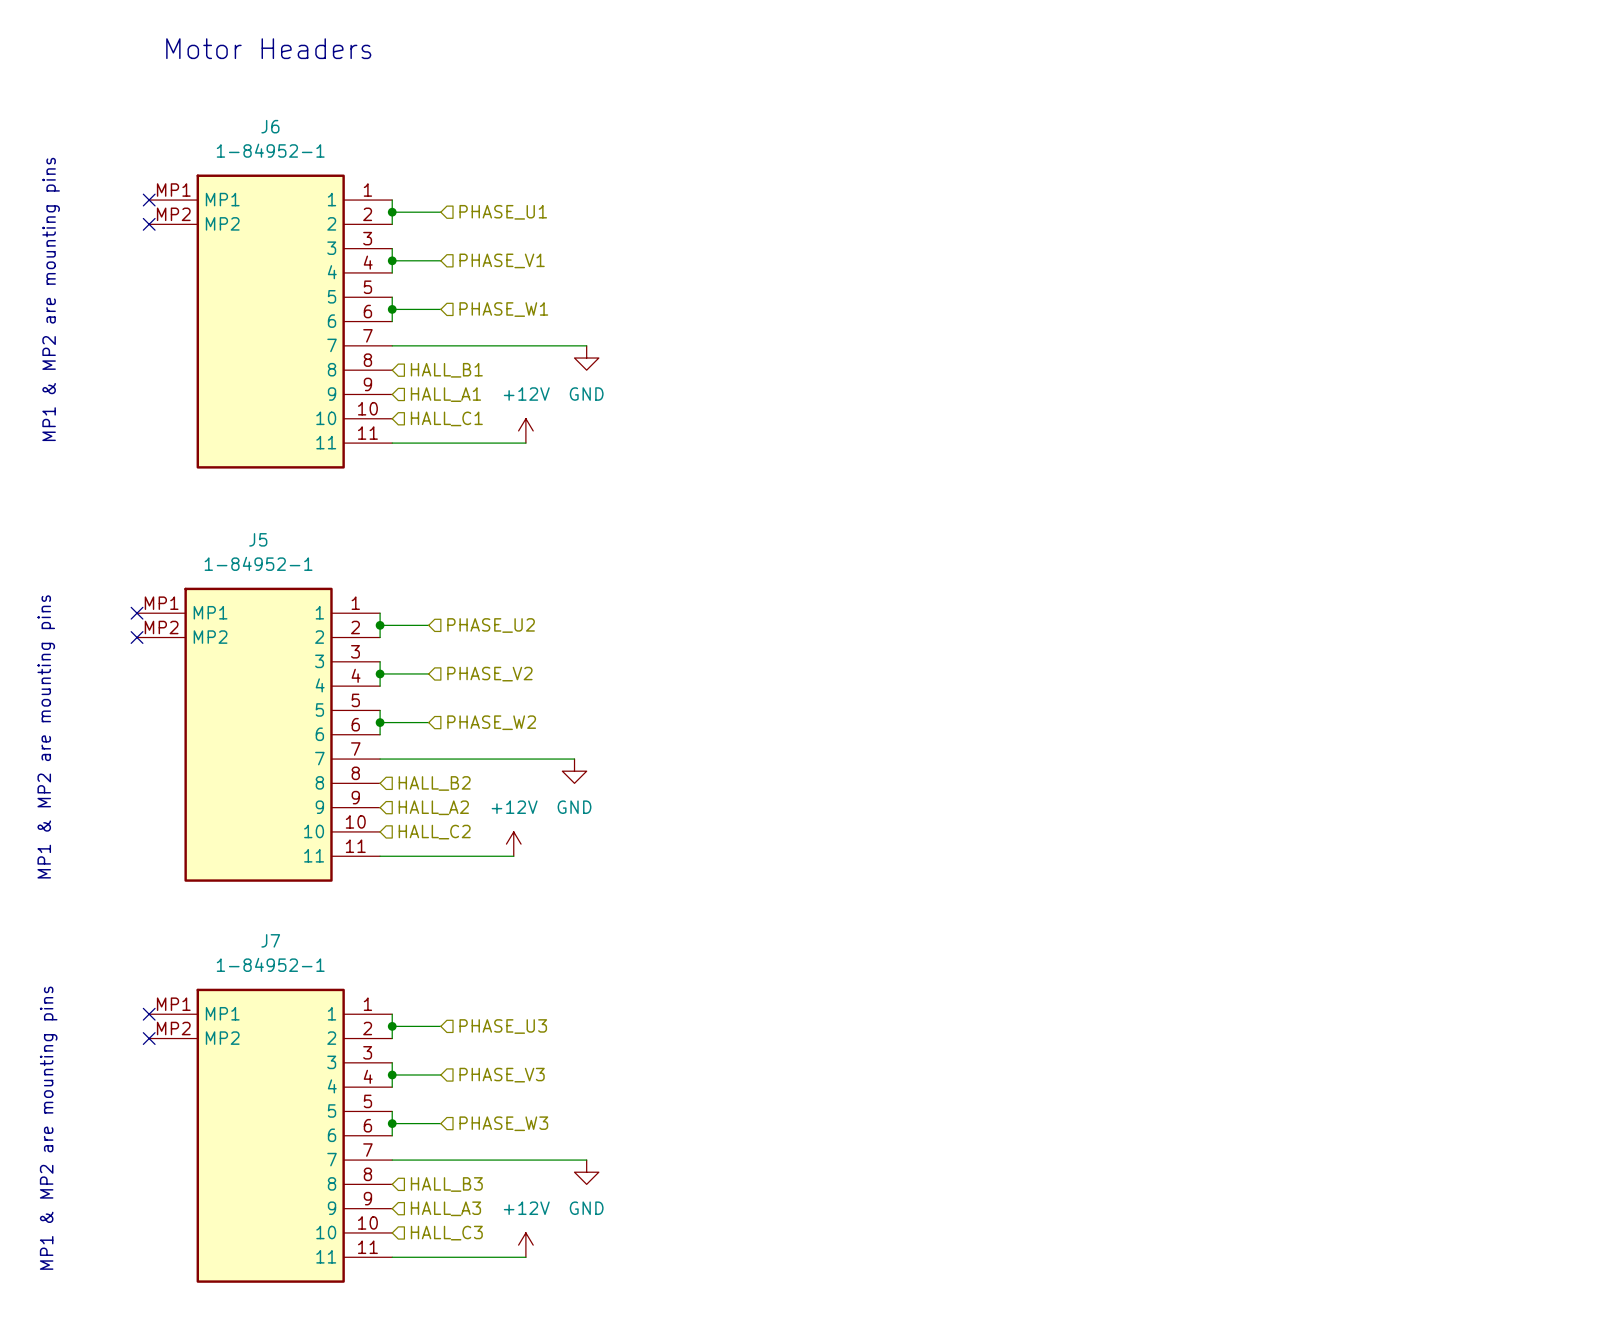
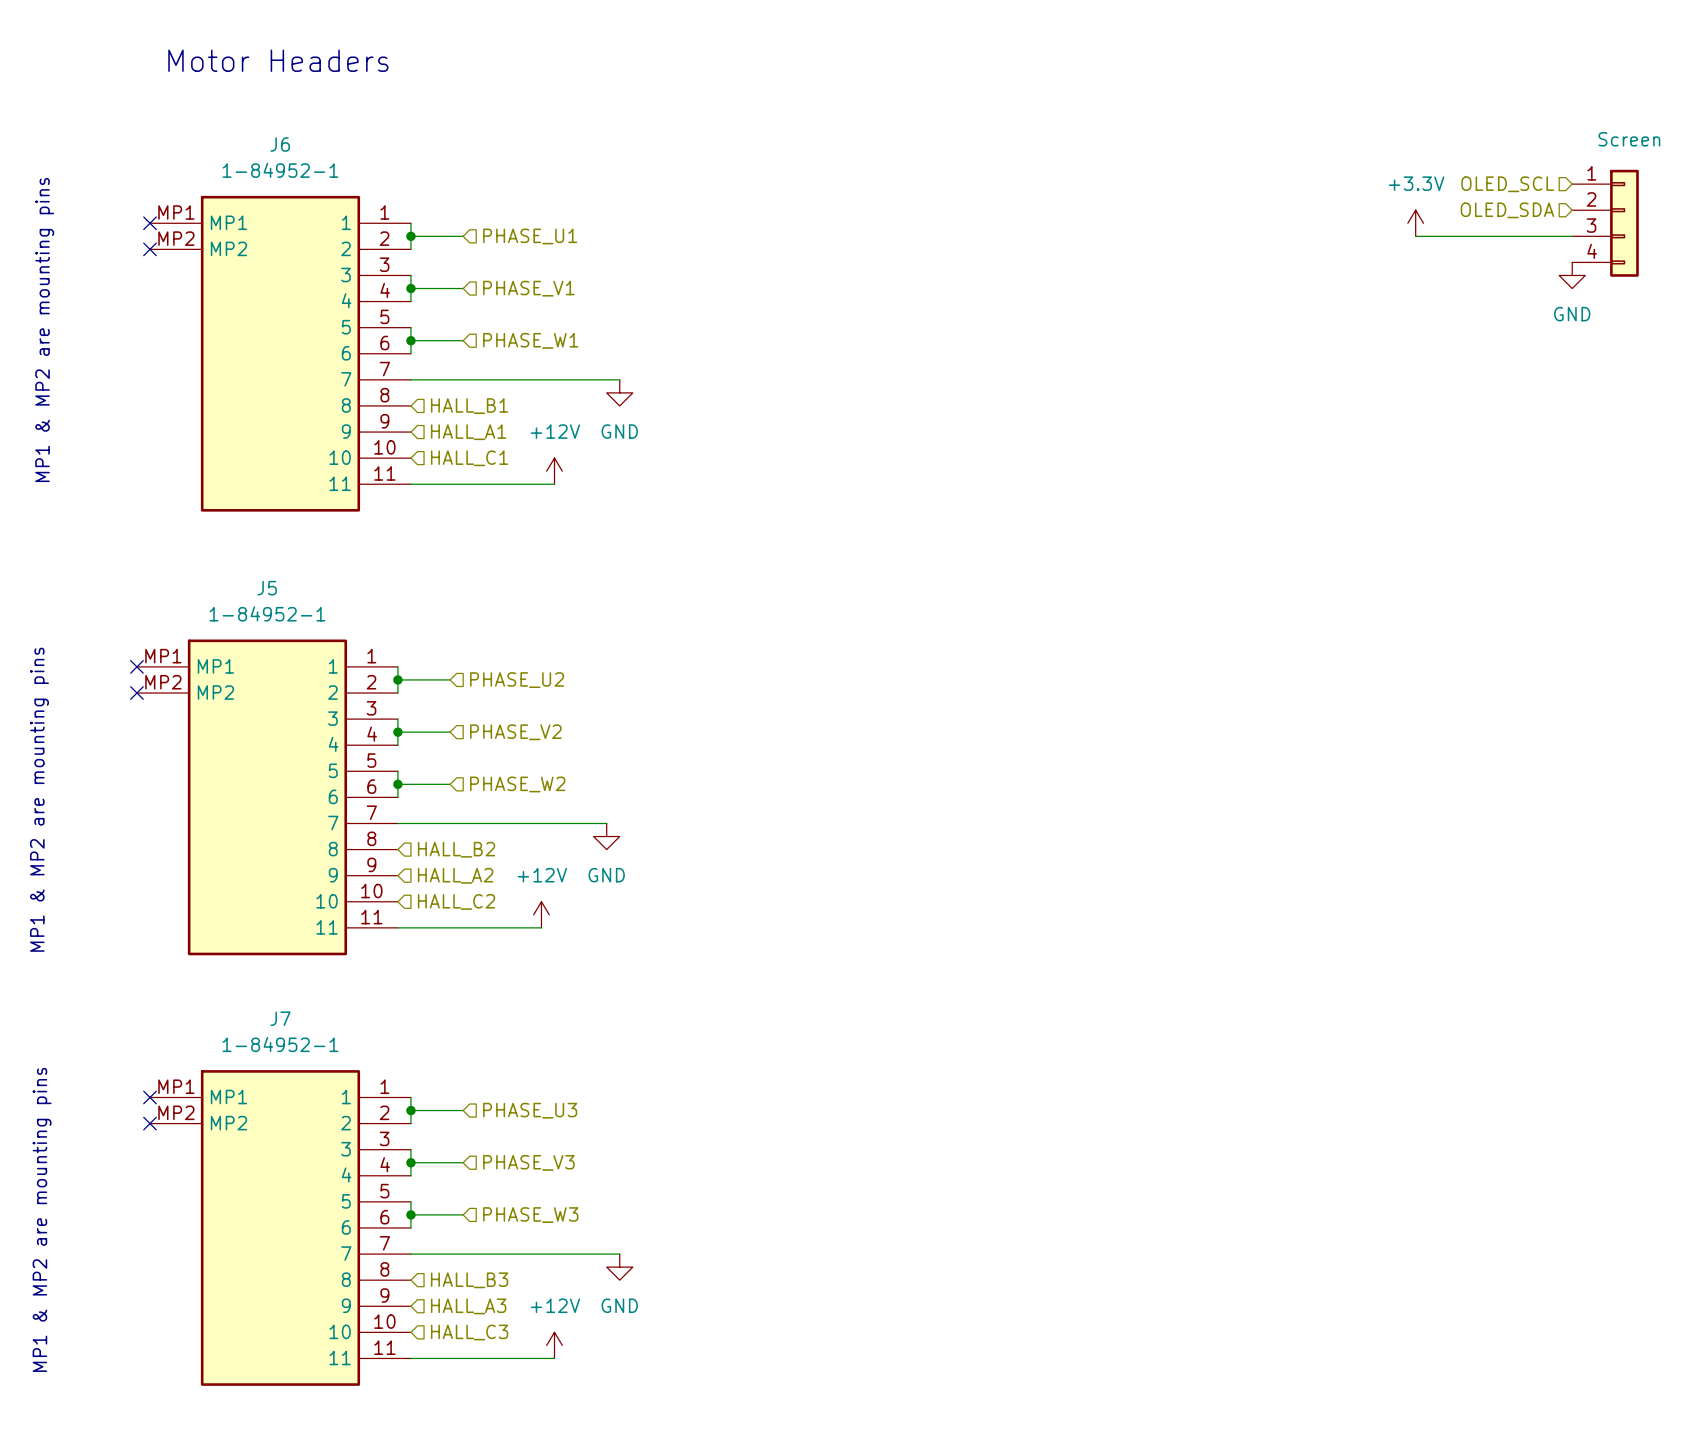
hierarchical label: none -> OLED_SCL (1507, 184)
hierarchical label: none -> OLED_SDA (1507, 210)
power symbol: none -> +3.3V (1415, 223)
Screen: none -> (1605, 223)
wire: none -> (1415, 236) (1572, 236)
power symbol: none -> GND (1572, 275)

